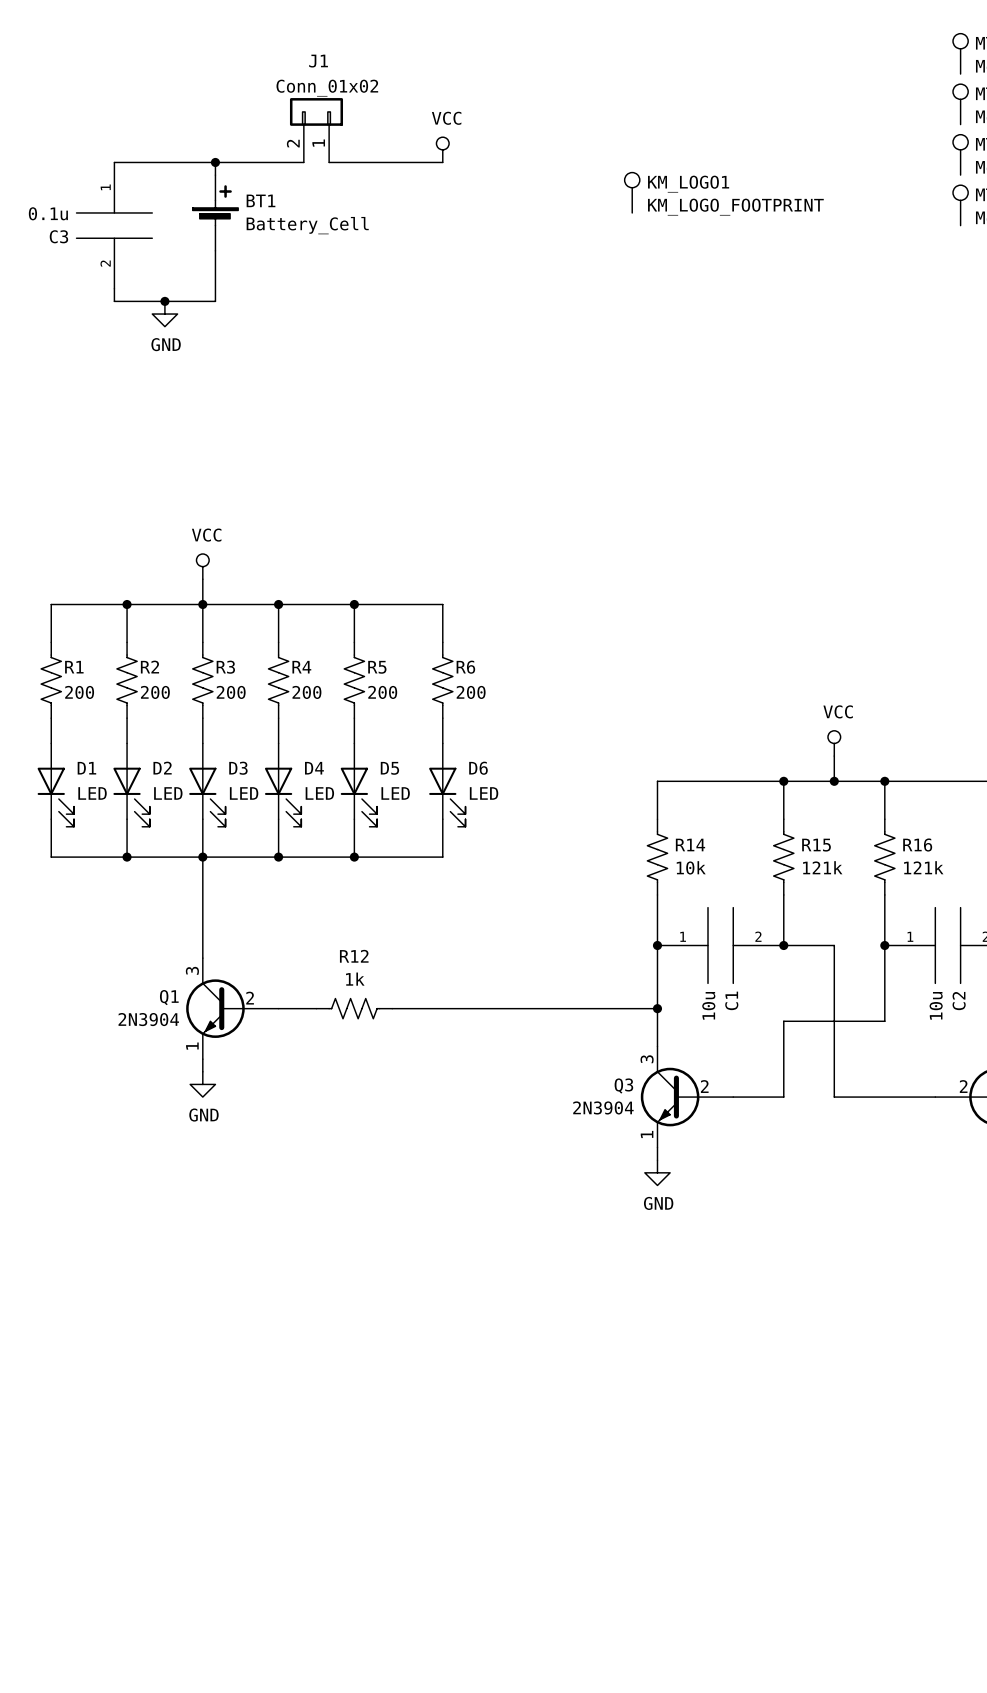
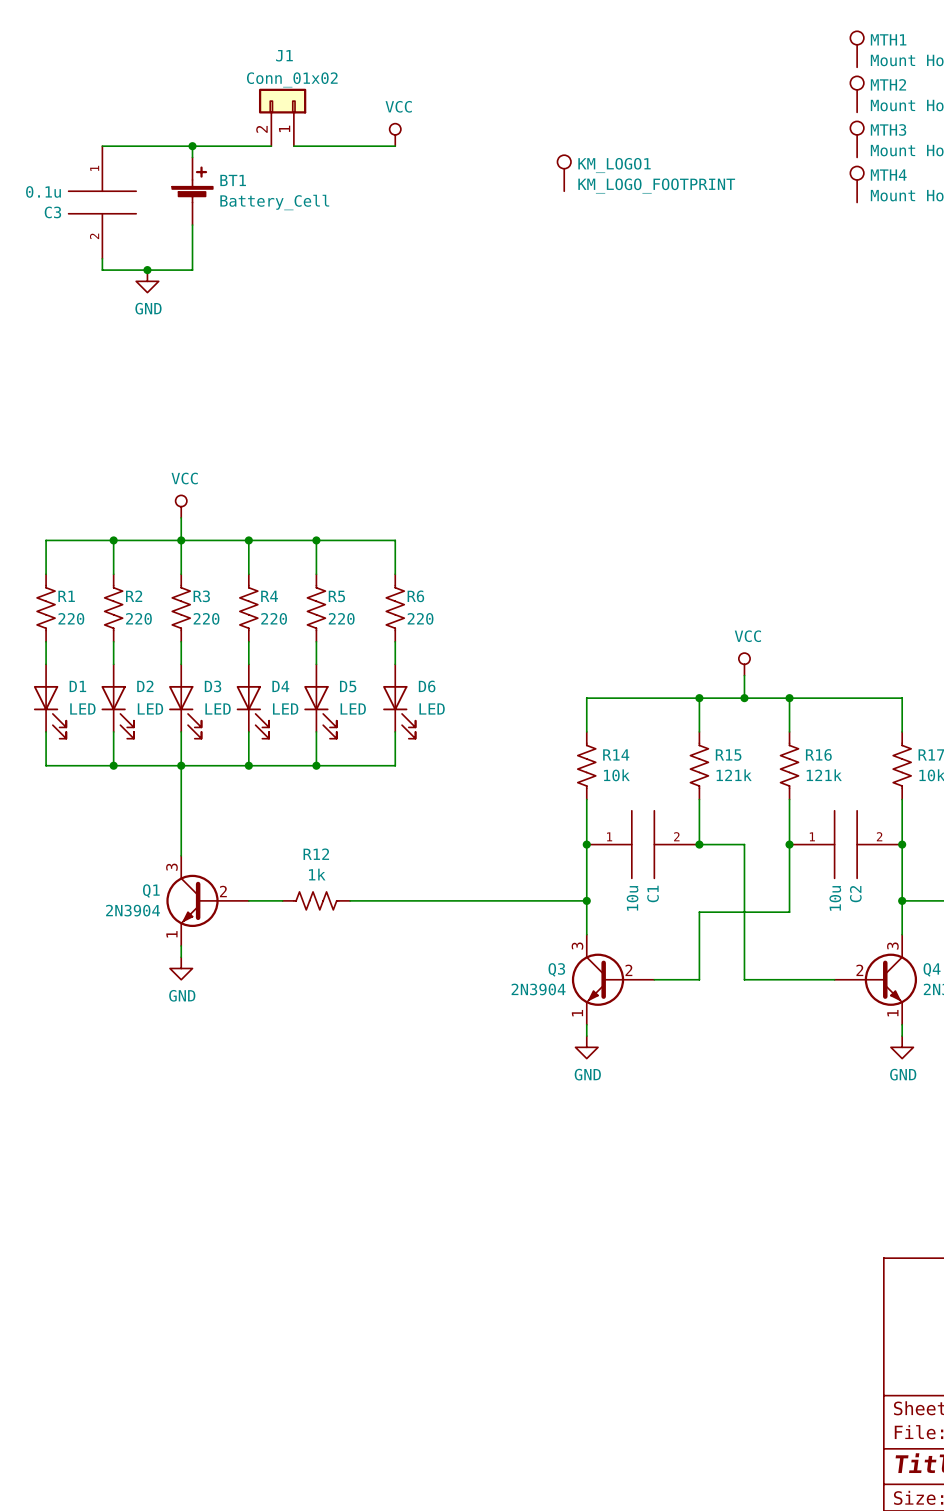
R1 value: 200 (79, 692) -> 220 (71, 618)
R2 value: 200 (155, 692) -> 220 (138, 618)
R3 value: 200 (231, 692) -> 220 (206, 618)
R4 value: 200 (306, 692) -> 220 (274, 618)
R5 value: 200 (382, 692) -> 220 (341, 618)
R6 value: 200 (471, 692) -> 220 (420, 618)

